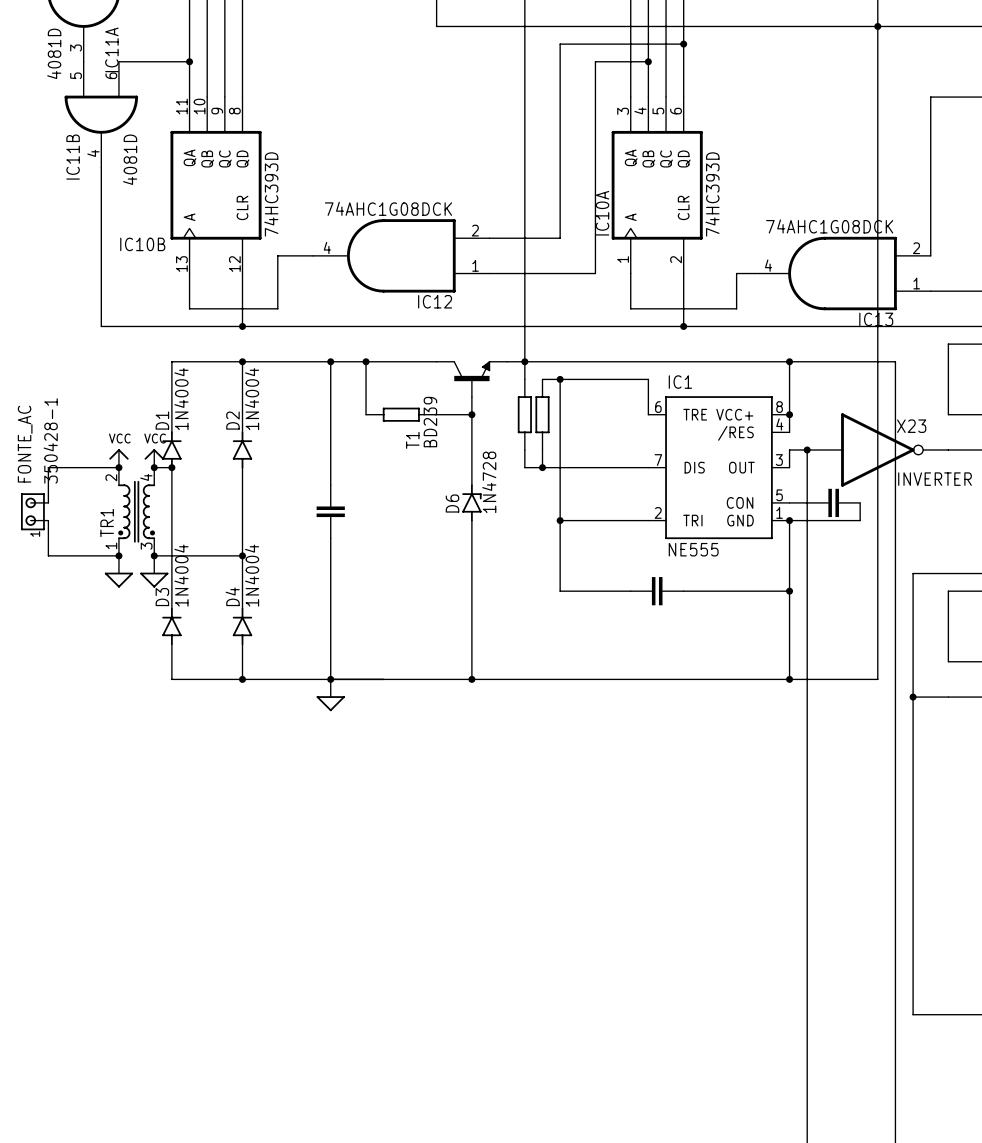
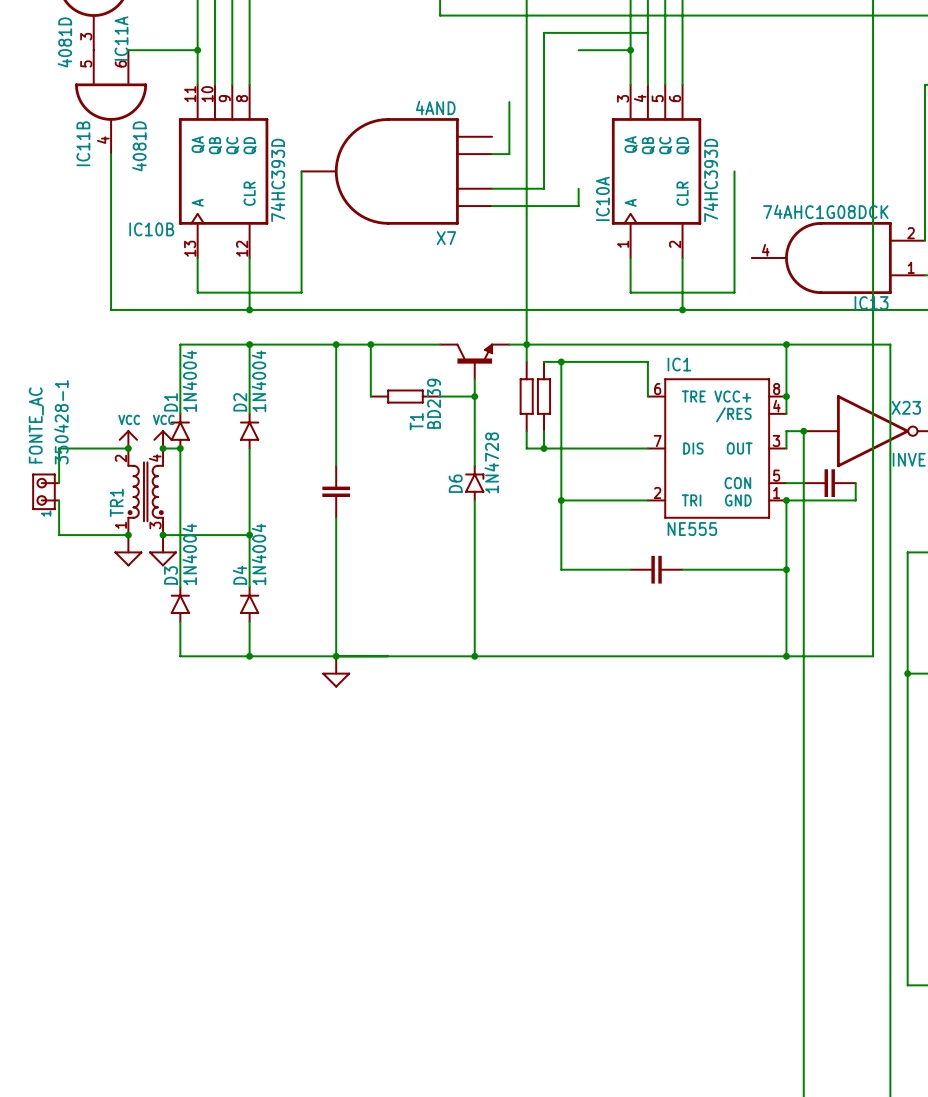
junction: (877, 26) -> none
wire: (560, 44) (560, 238) (489, 238) -> (561, 32) (544, 32) (544, 188) (492, 188)
wire: (648, 44) (683, 44) -> none
junction: (683, 44) -> none
wire: (595, 61) (595, 273) (489, 273) -> (595, 50) (578, 50)
wire: (630, 61) (648, 61) -> none
junction position: (648, 61) -> (630, 50)
wire: none -> (509, 102) (509, 154) (492, 154)
X7: none -> 4AND (396, 171)
wire: none -> (578, 188) (578, 206) (492, 206)
wire: (313, 255) (277, 255) (277, 308) -> (301, 171) (301, 292) (284, 292)
IC12: 74AHC1G08DCK (401, 255) -> none
wire: (736, 273) (754, 273) -> (734, 258) (734, 171)

